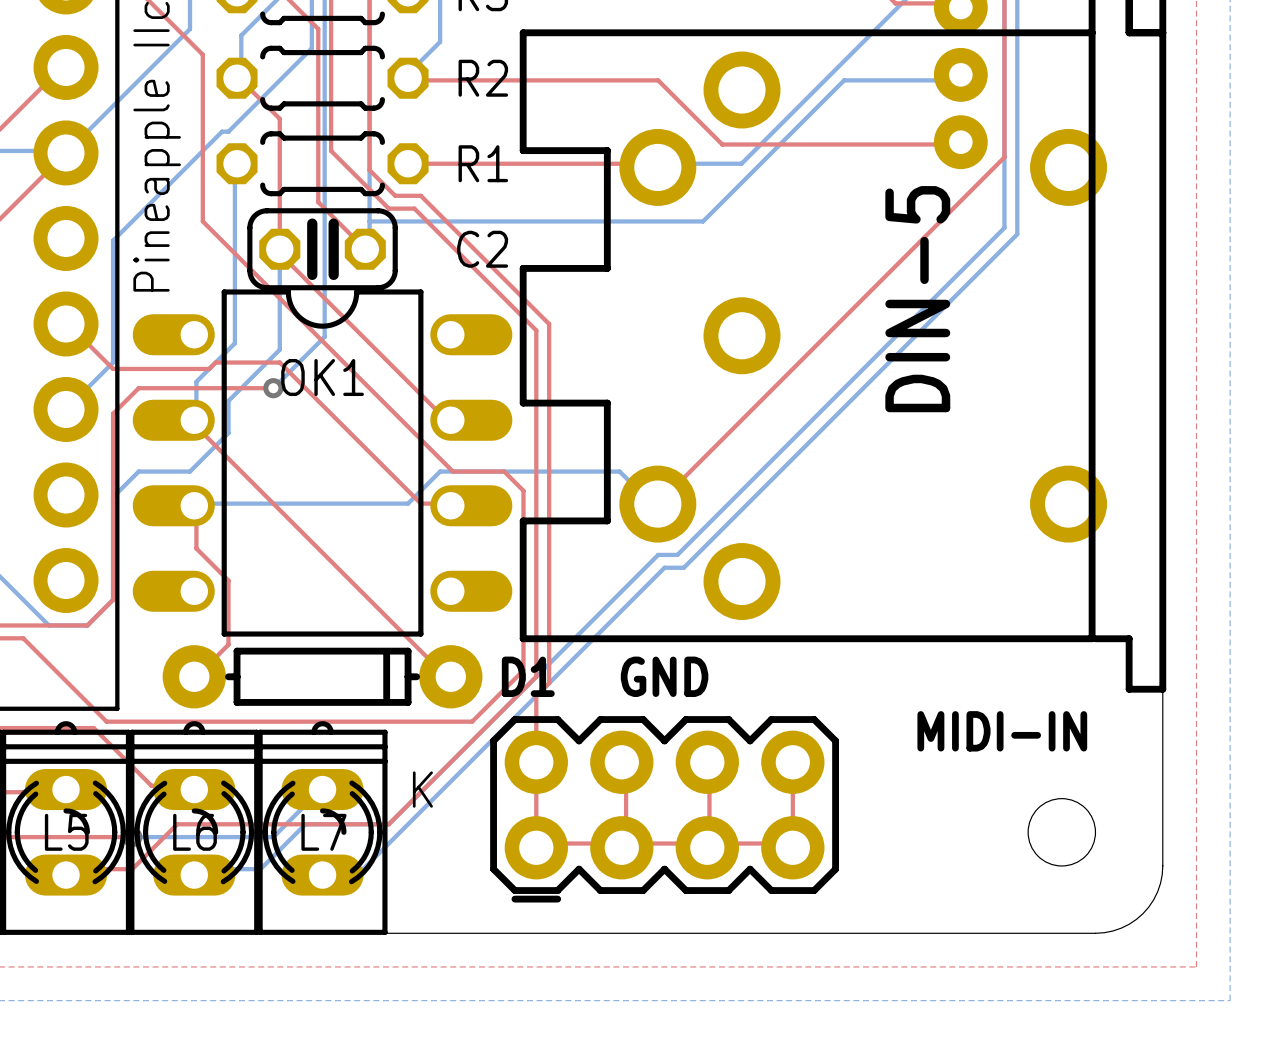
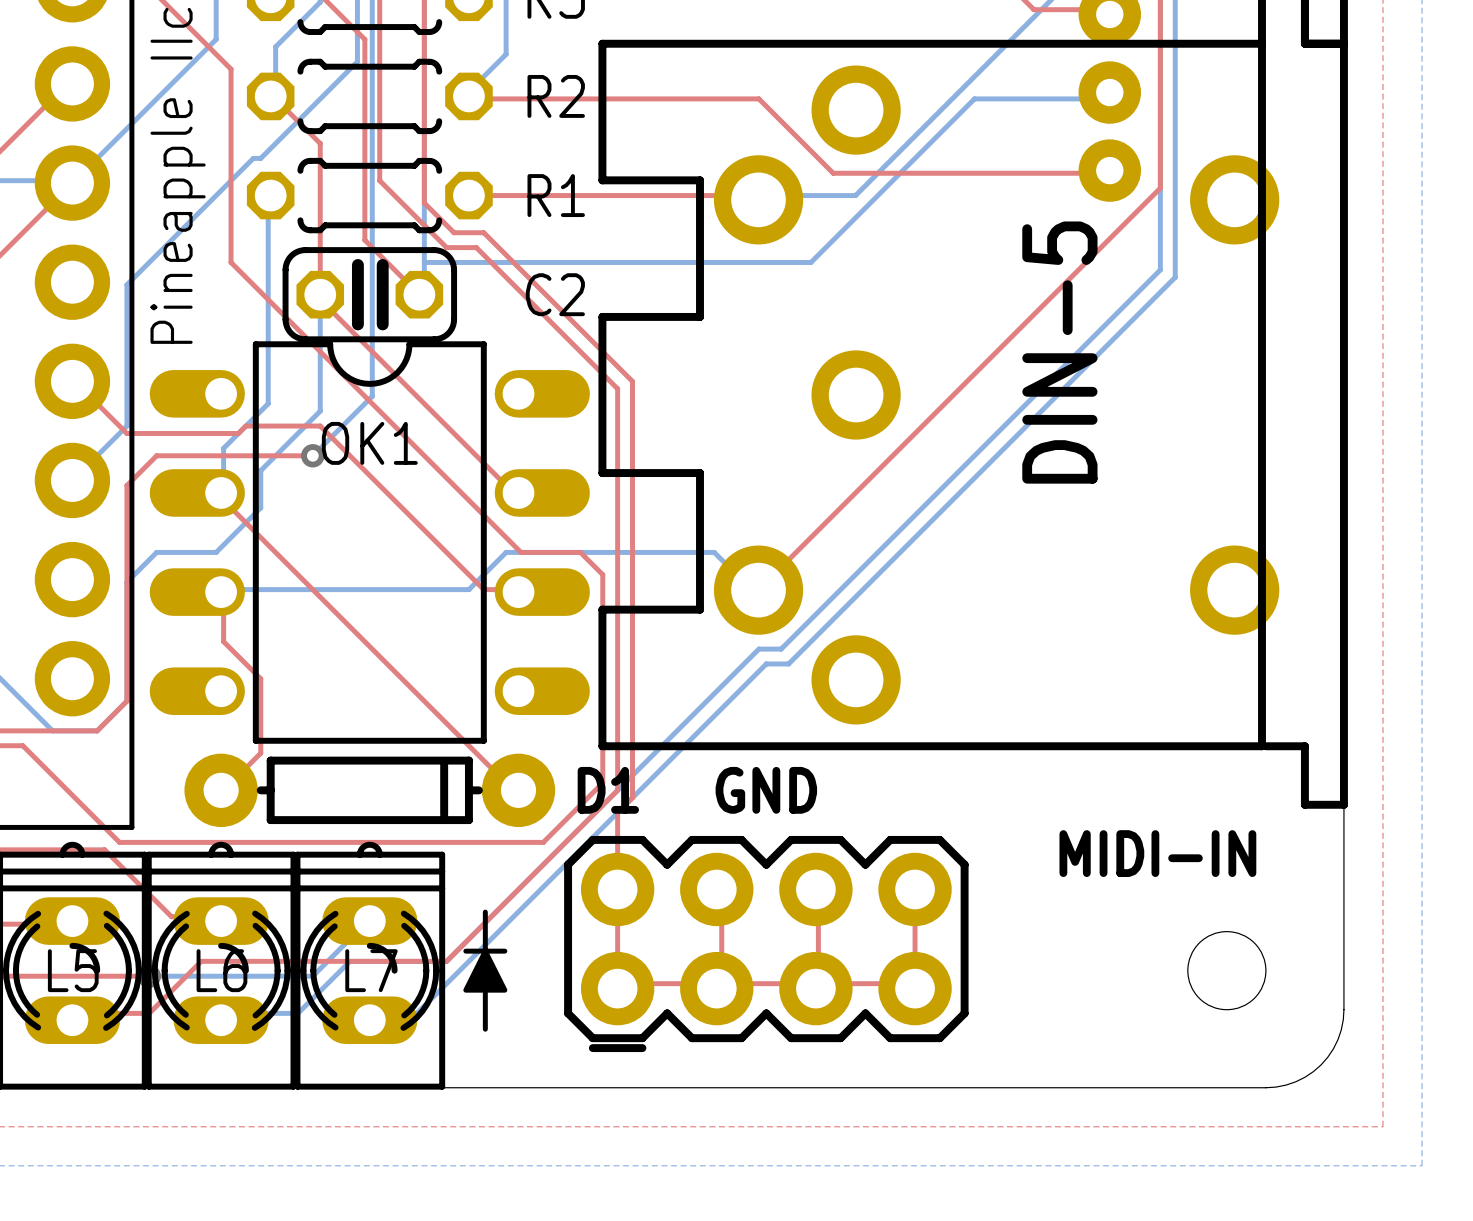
line: none -> (485, 912) (485, 1029)
text: K (422, 789) -> none
drawing: none -> [463, 948, 508, 993]
line: none -> (465, 951) (504, 951)

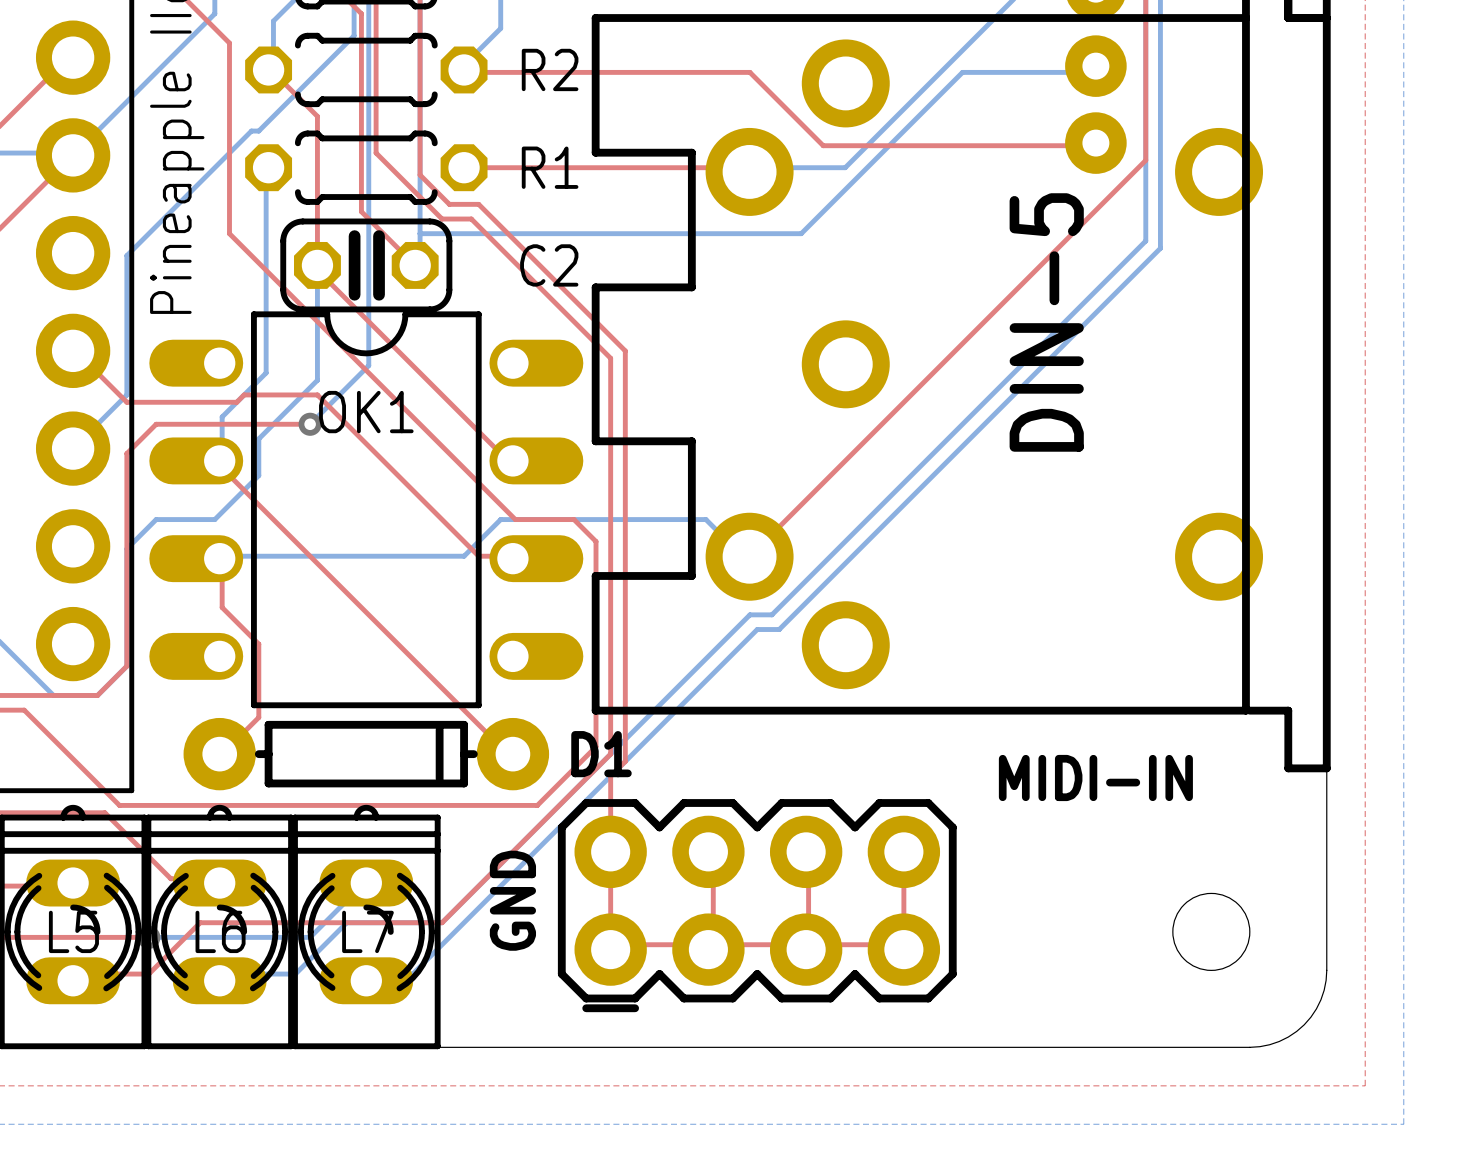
GND name rotation: 0° (766, 790) -> 90° counterclockwise (512, 900)
GND name position: GND (766, 790) -> GND (512, 900)
MIDI-IN name position: MIDI-IN (1157, 853) -> MIDI-IN (1095, 777)
line: (485, 912) (485, 1029) -> none
drawing: [463, 948, 508, 993] -> none
line: (465, 951) (504, 951) -> none

